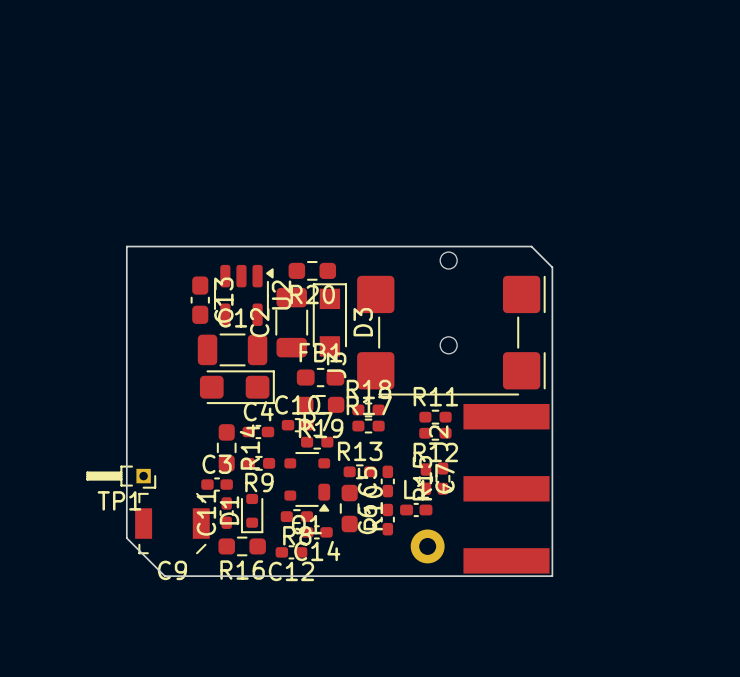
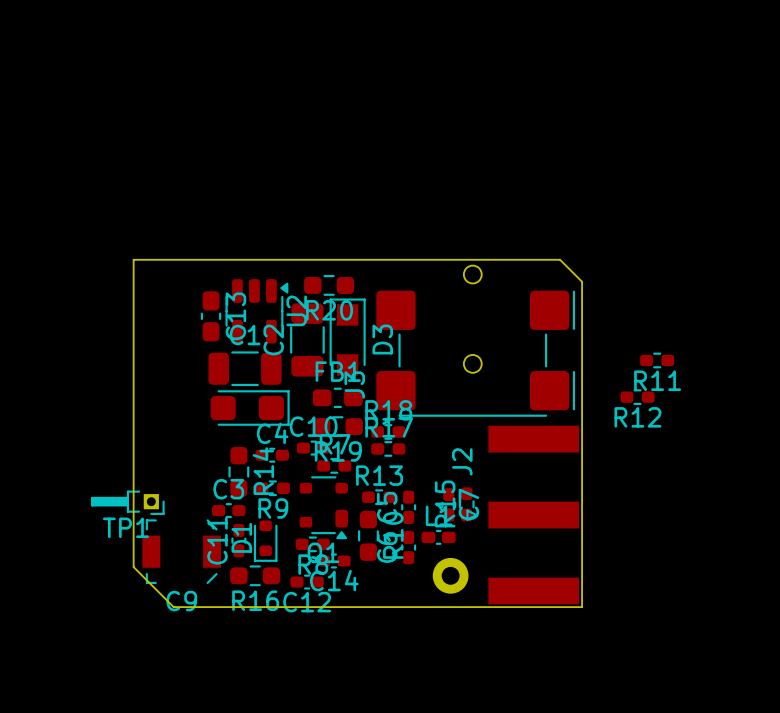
R11 name position: R11 (435, 396) -> R11 (657, 380)
R11 position: (435, 417) -> (657, 360)
R12 position: (435, 433) -> (637, 397)

